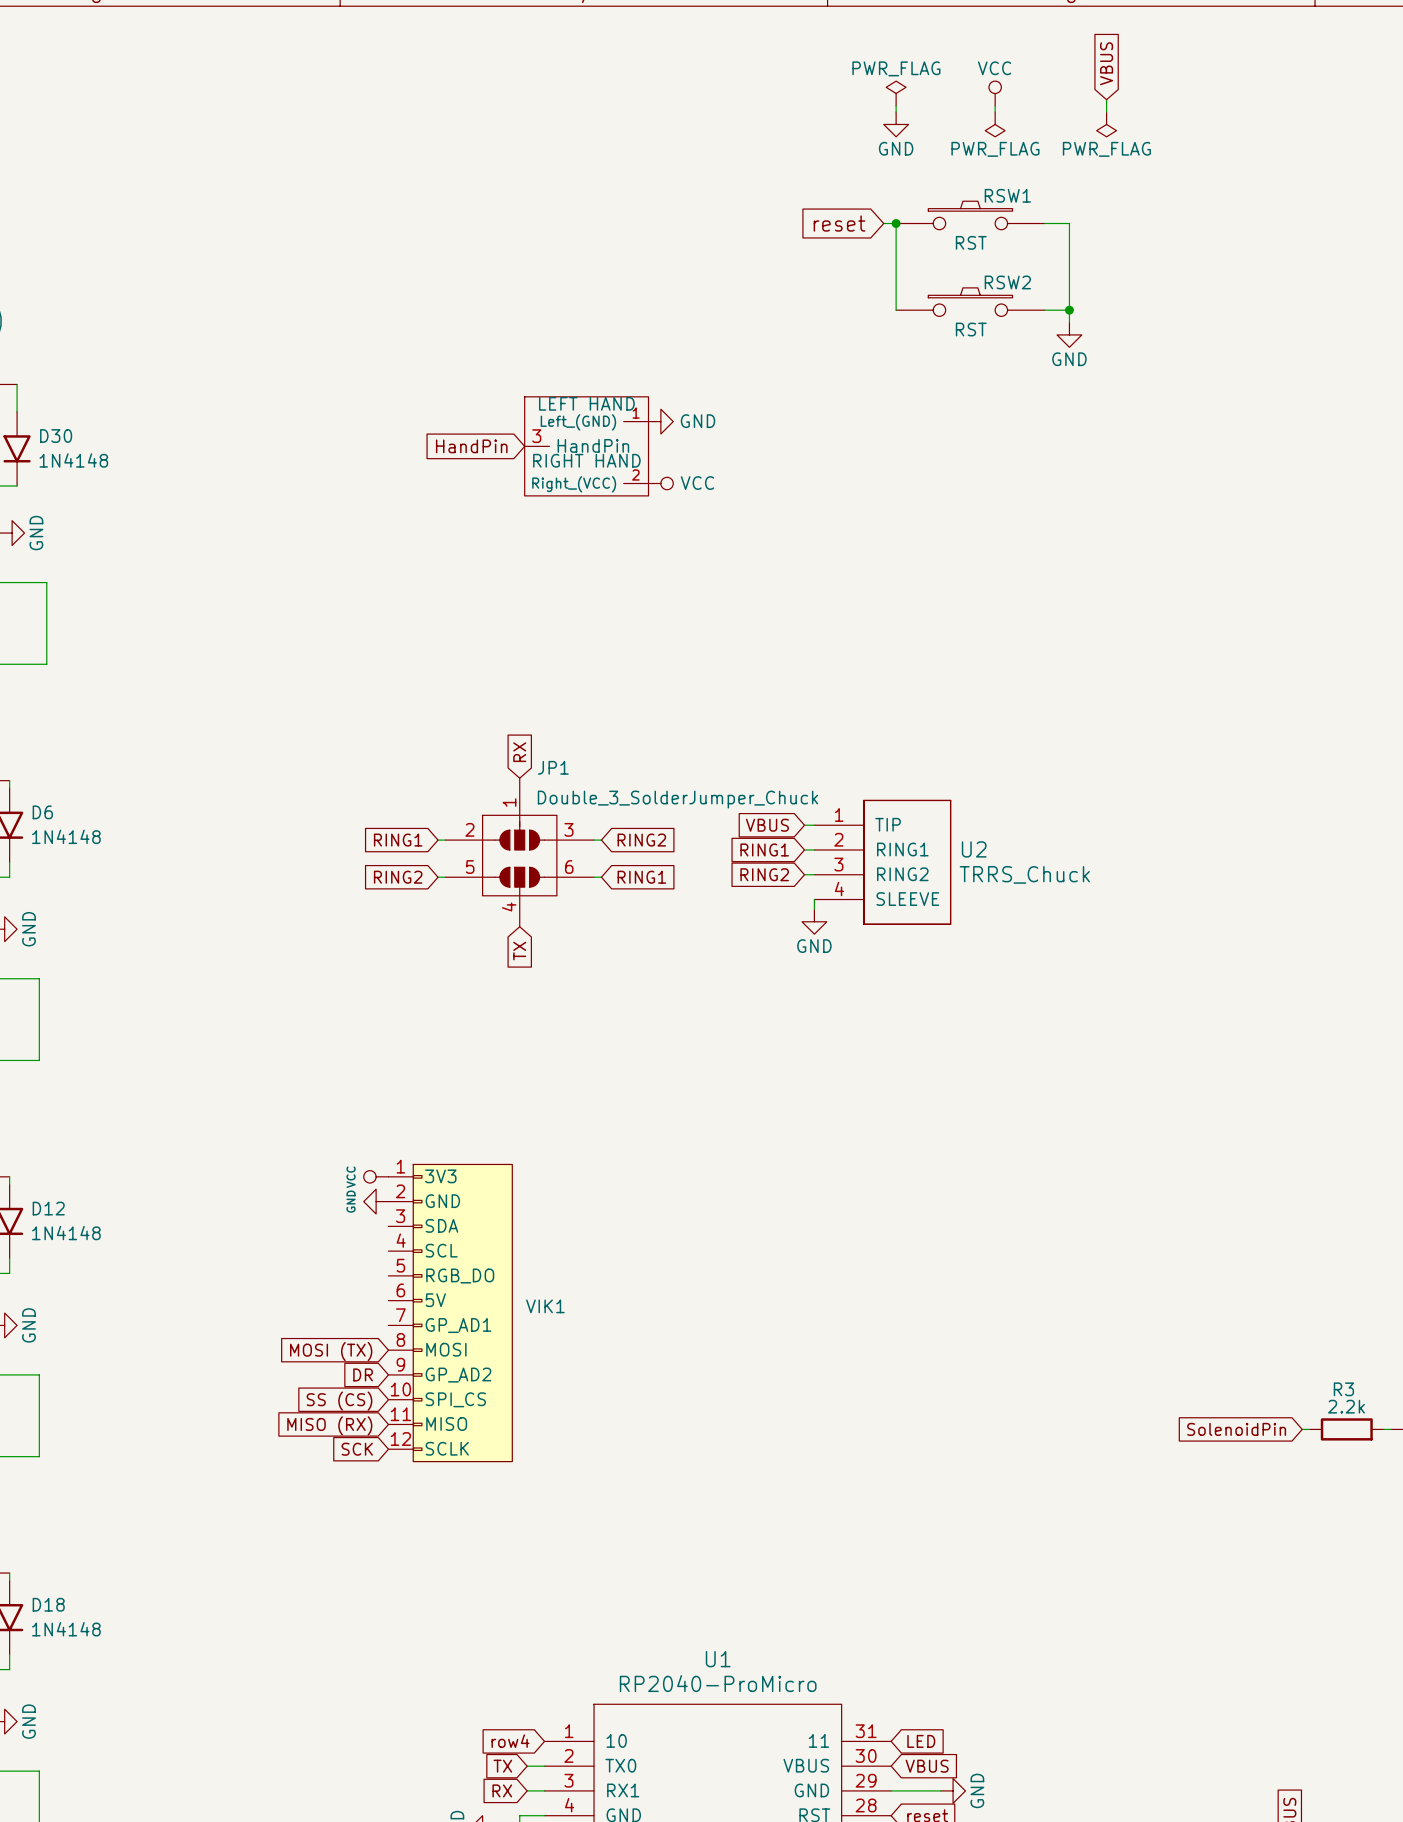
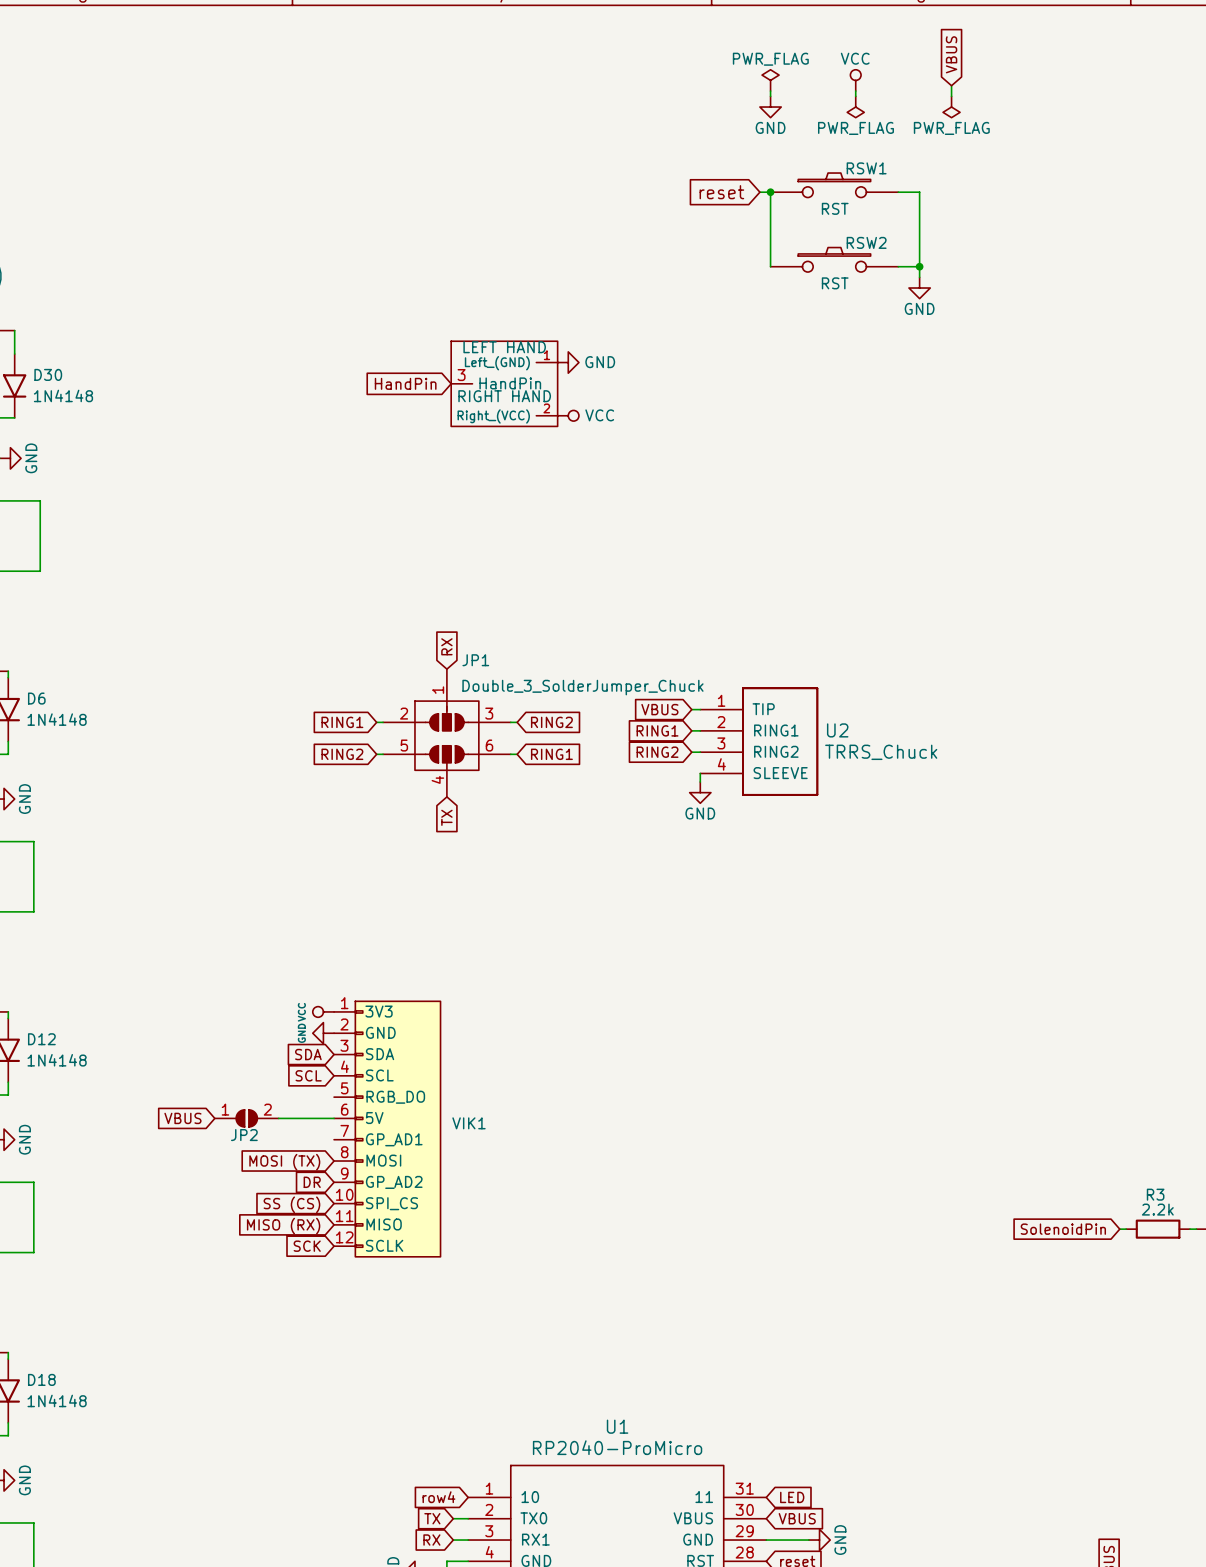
global label: none -> SDA (308, 1054)
global label: none -> SCL (308, 1075)
global label: none -> VBUS (182, 1118)
JP2: none -> (246, 1118)
wire: none -> (278, 1118) (334, 1118)

